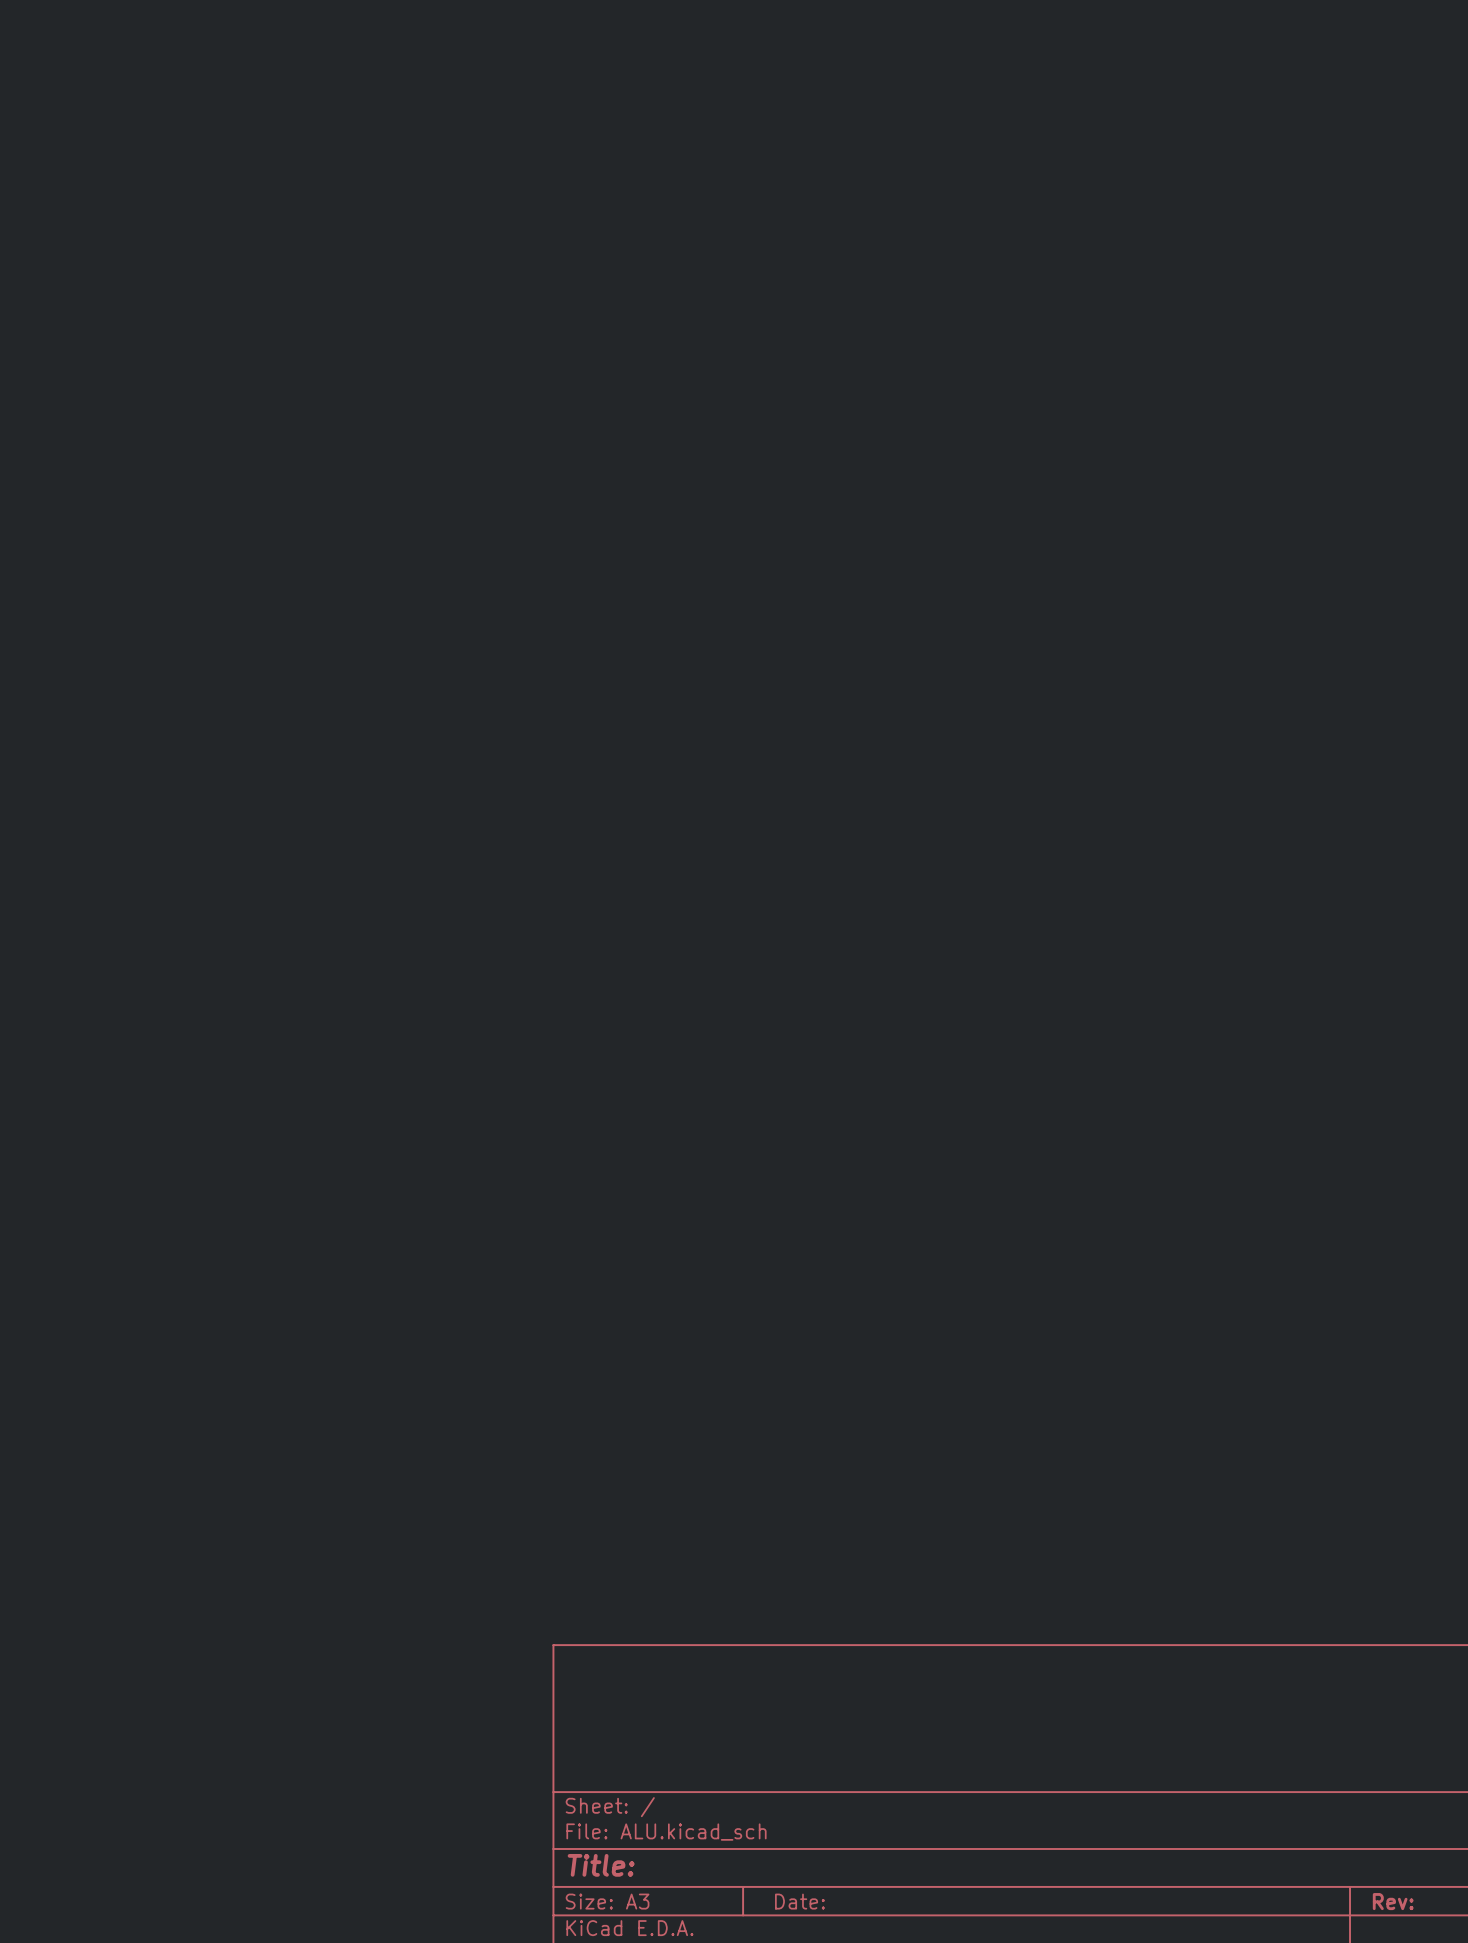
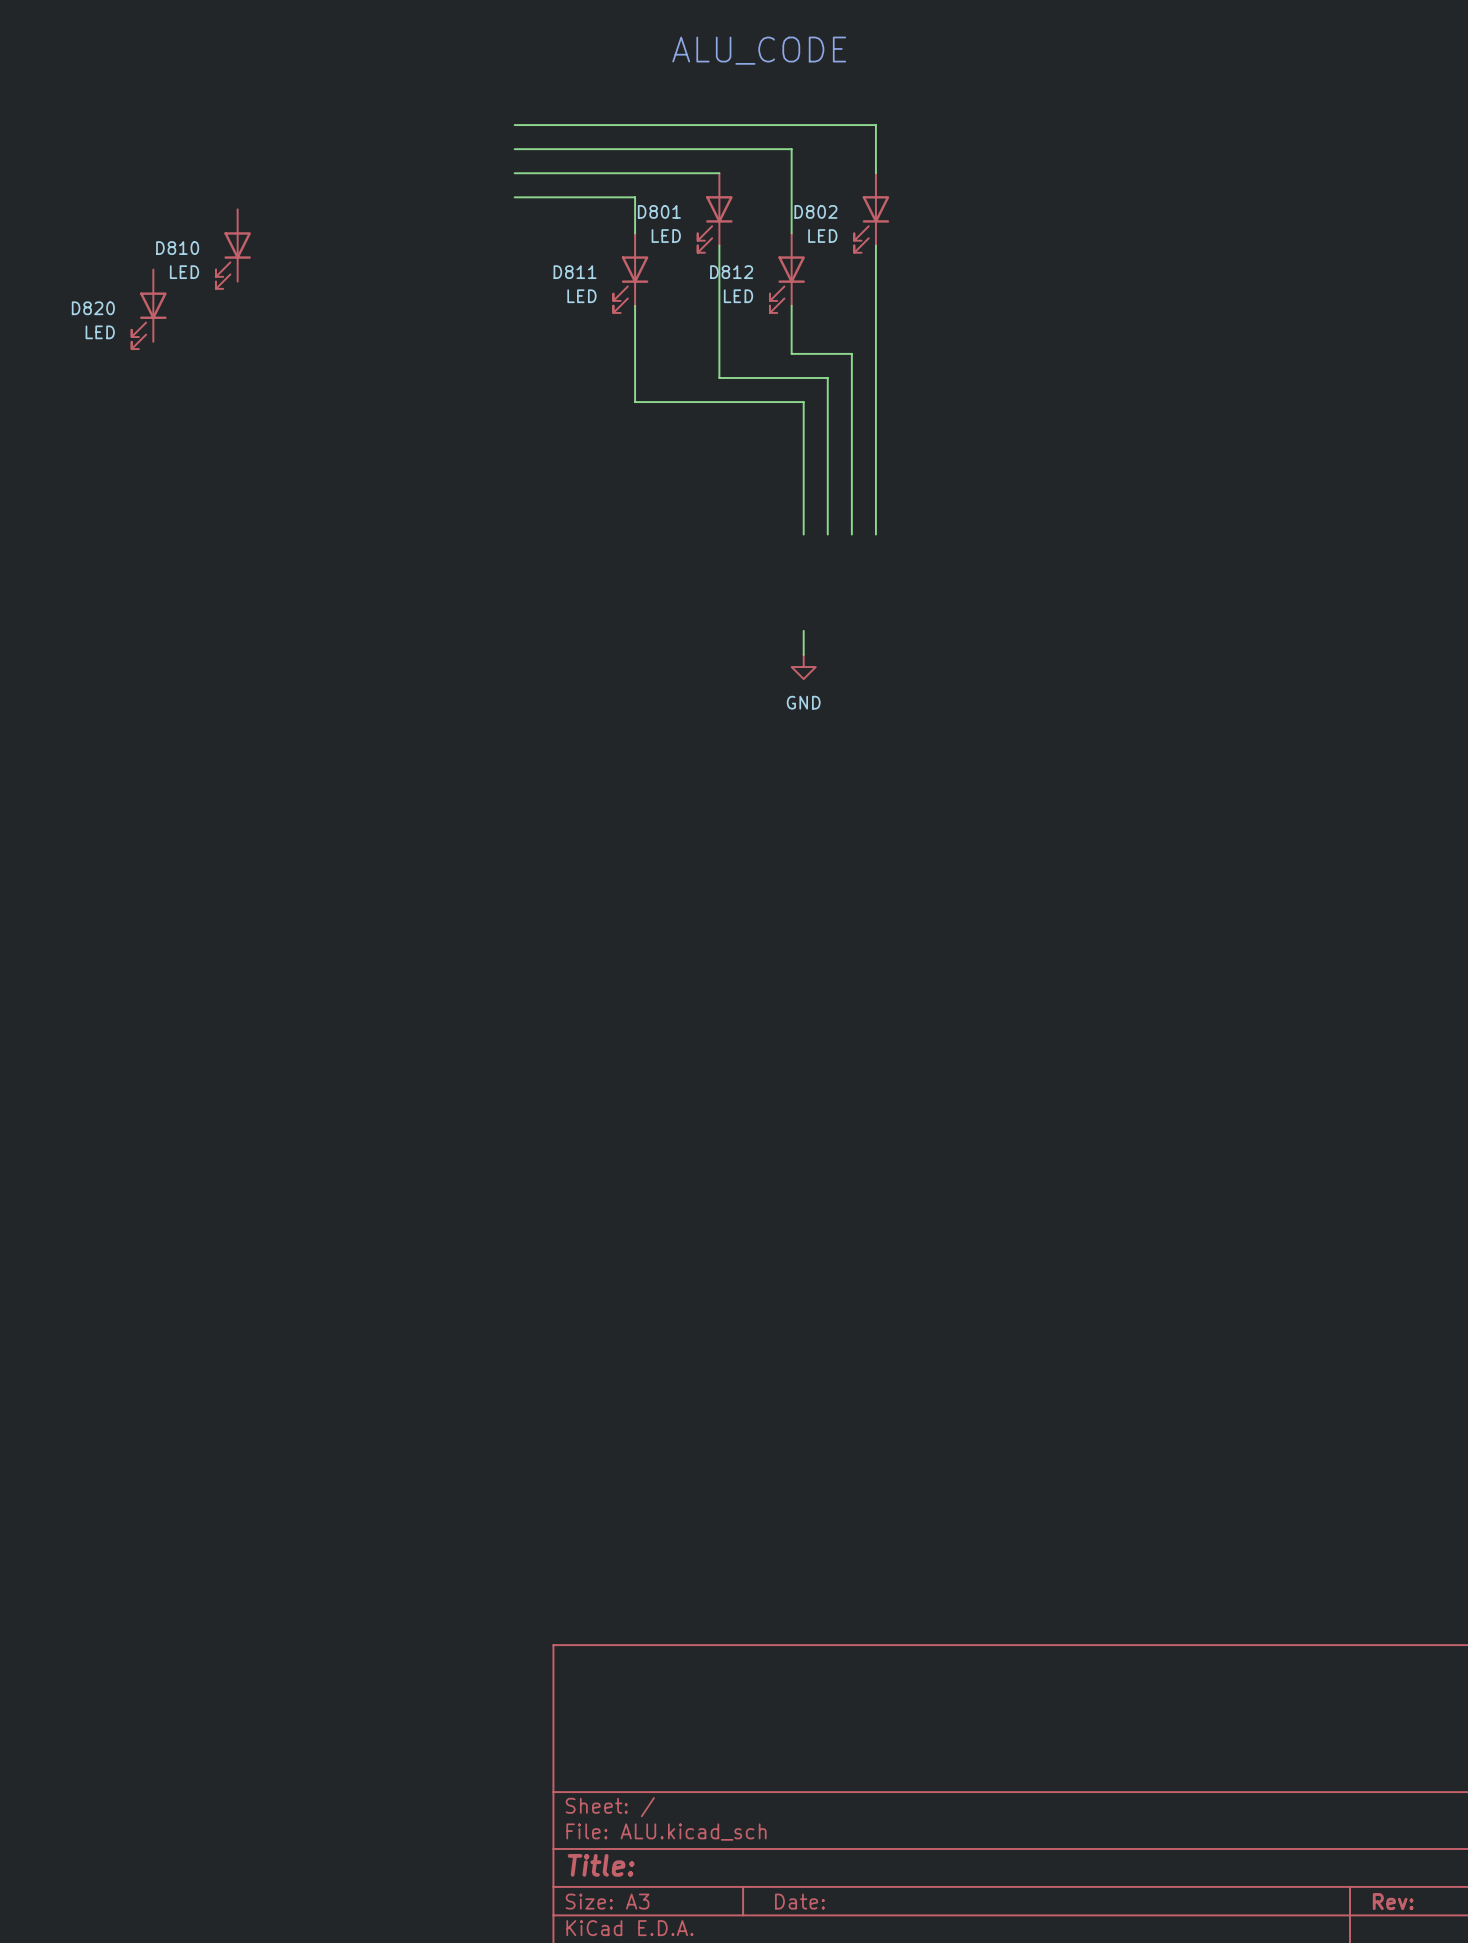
text: none -> ALU_CODE (759, 50)
wire: none -> (514, 125) (875, 125) (875, 173)
wire: none -> (514, 149) (791, 149) (791, 233)
wire: none -> (514, 173) (719, 173)
wire: none -> (514, 197) (635, 197) (635, 233)
D801: none -> LED (715, 212)
D802: none -> LED (871, 212)
wire: none -> (719, 245) (719, 377) (827, 377) (827, 534)
wire: none -> (875, 245) (875, 534)
D810: none -> LED (233, 249)
D811: none -> LED (630, 273)
D812: none -> LED (787, 273)
wire: none -> (635, 305) (635, 402) (803, 402) (803, 534)
wire: none -> (791, 305) (791, 353) (851, 353) (851, 534)
D820: none -> LED (149, 309)
wire: none -> (803, 630) (803, 654)
power symbol: none -> GND (803, 667)

